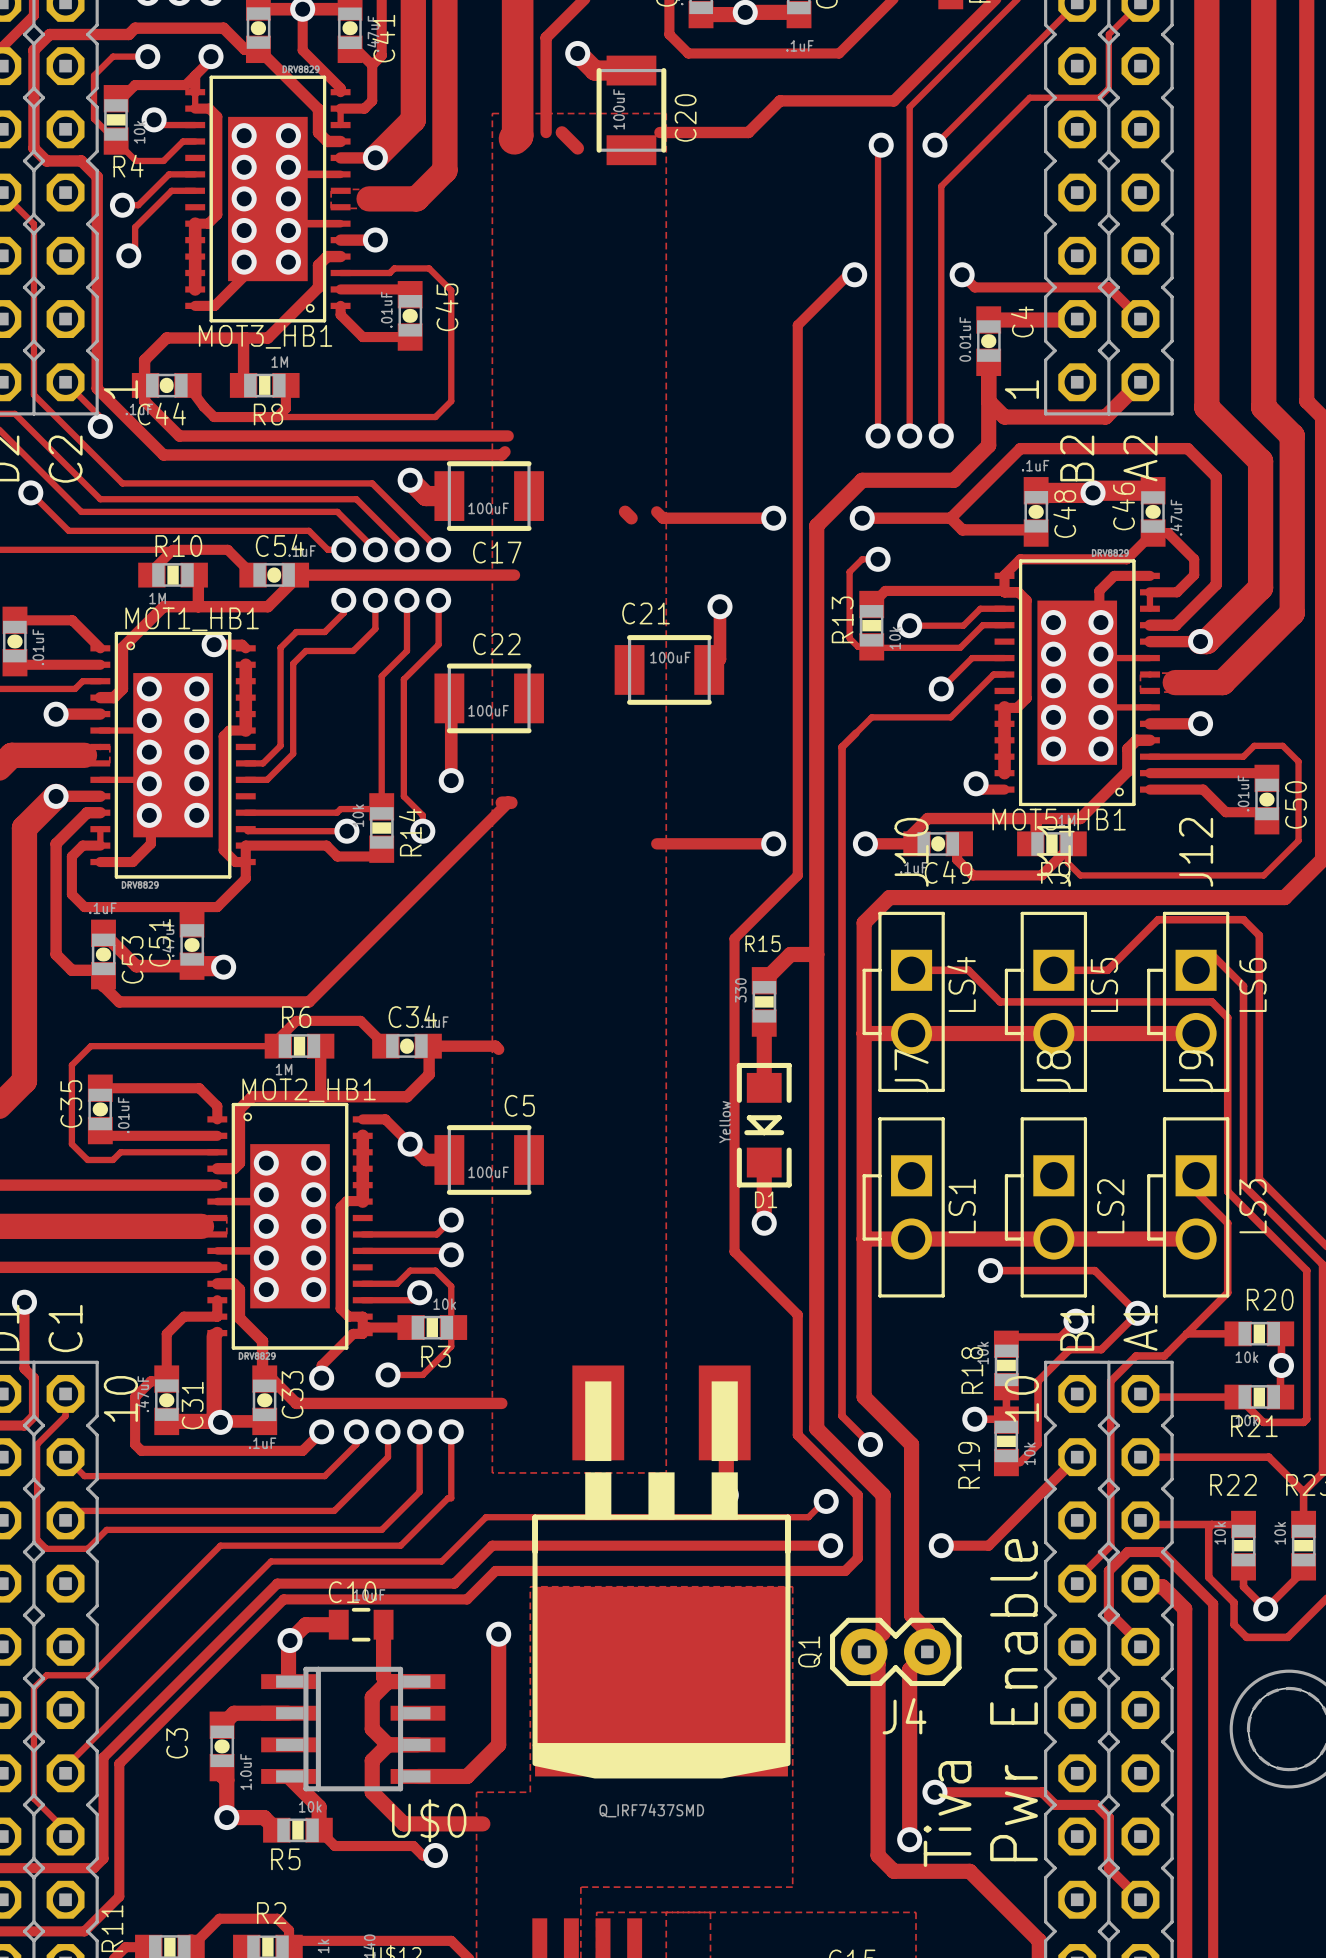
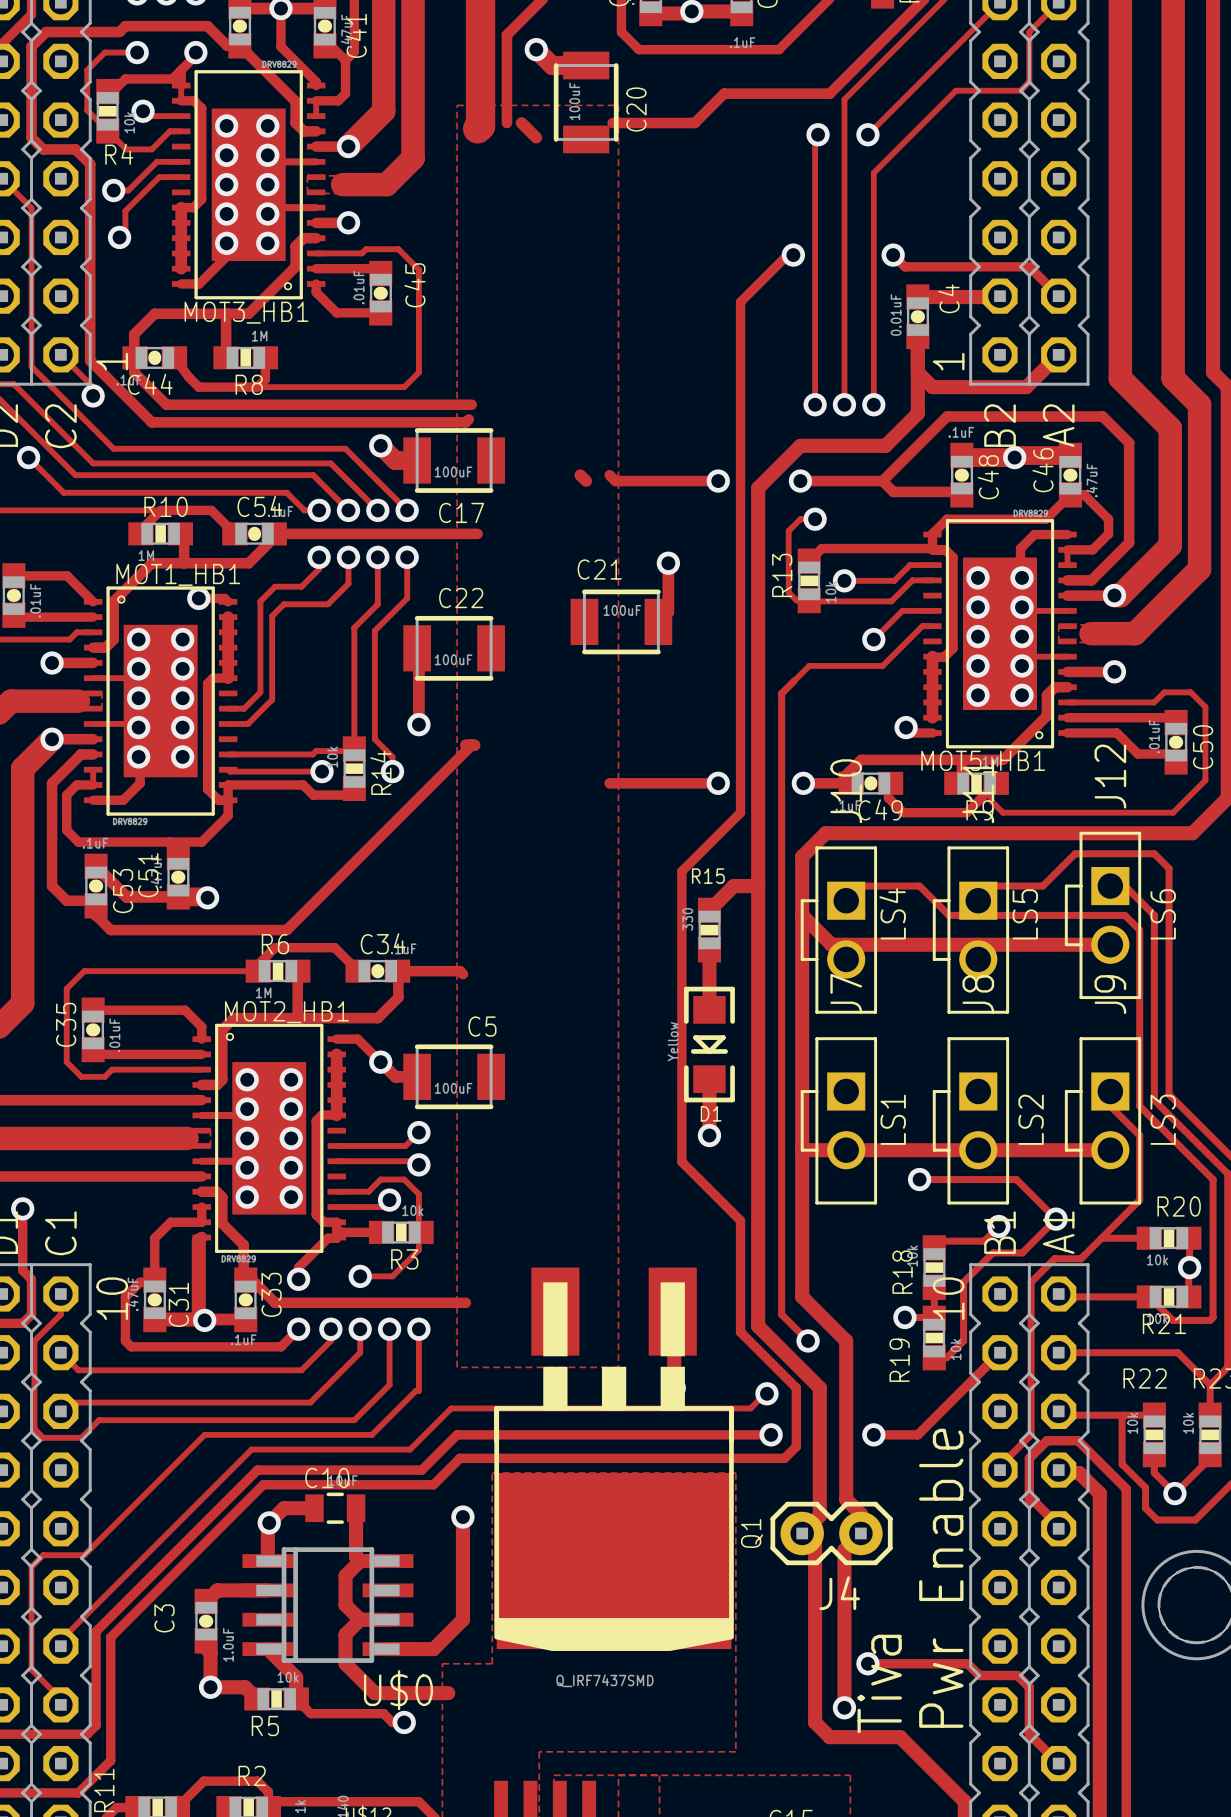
track: (1123, 954) (1107, 970) (1053, 970) -> (1042, 886) (978, 886)
track: (911, 970) (968, 970) (1000, 1001) (1211, 1001) (1227, 1017) -> (846, 886) (919, 886) (948, 915) (1125, 915) (1139, 930) (1139, 944)
track: none -> (802, 915) (831, 944) (1110, 944)
J12 position: (1188, 1001) -> (1103, 915)
track: (864, 1033) (1196, 1033) -> none

